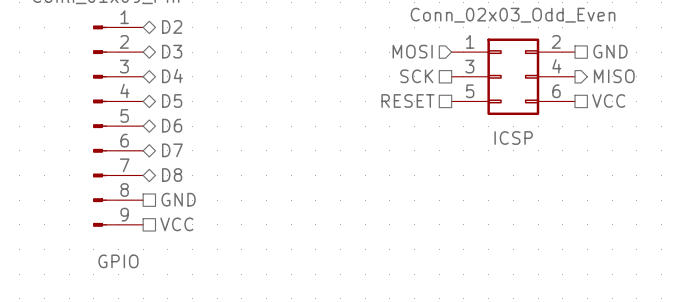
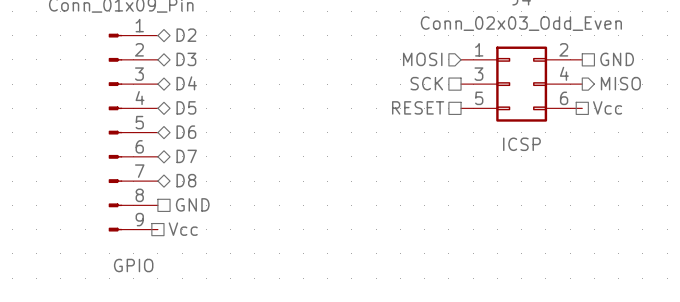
hierarchical label: VCC (608, 100) -> Vcc (607, 107)
hierarchical label: VCC (176, 224) -> Vcc (183, 229)

